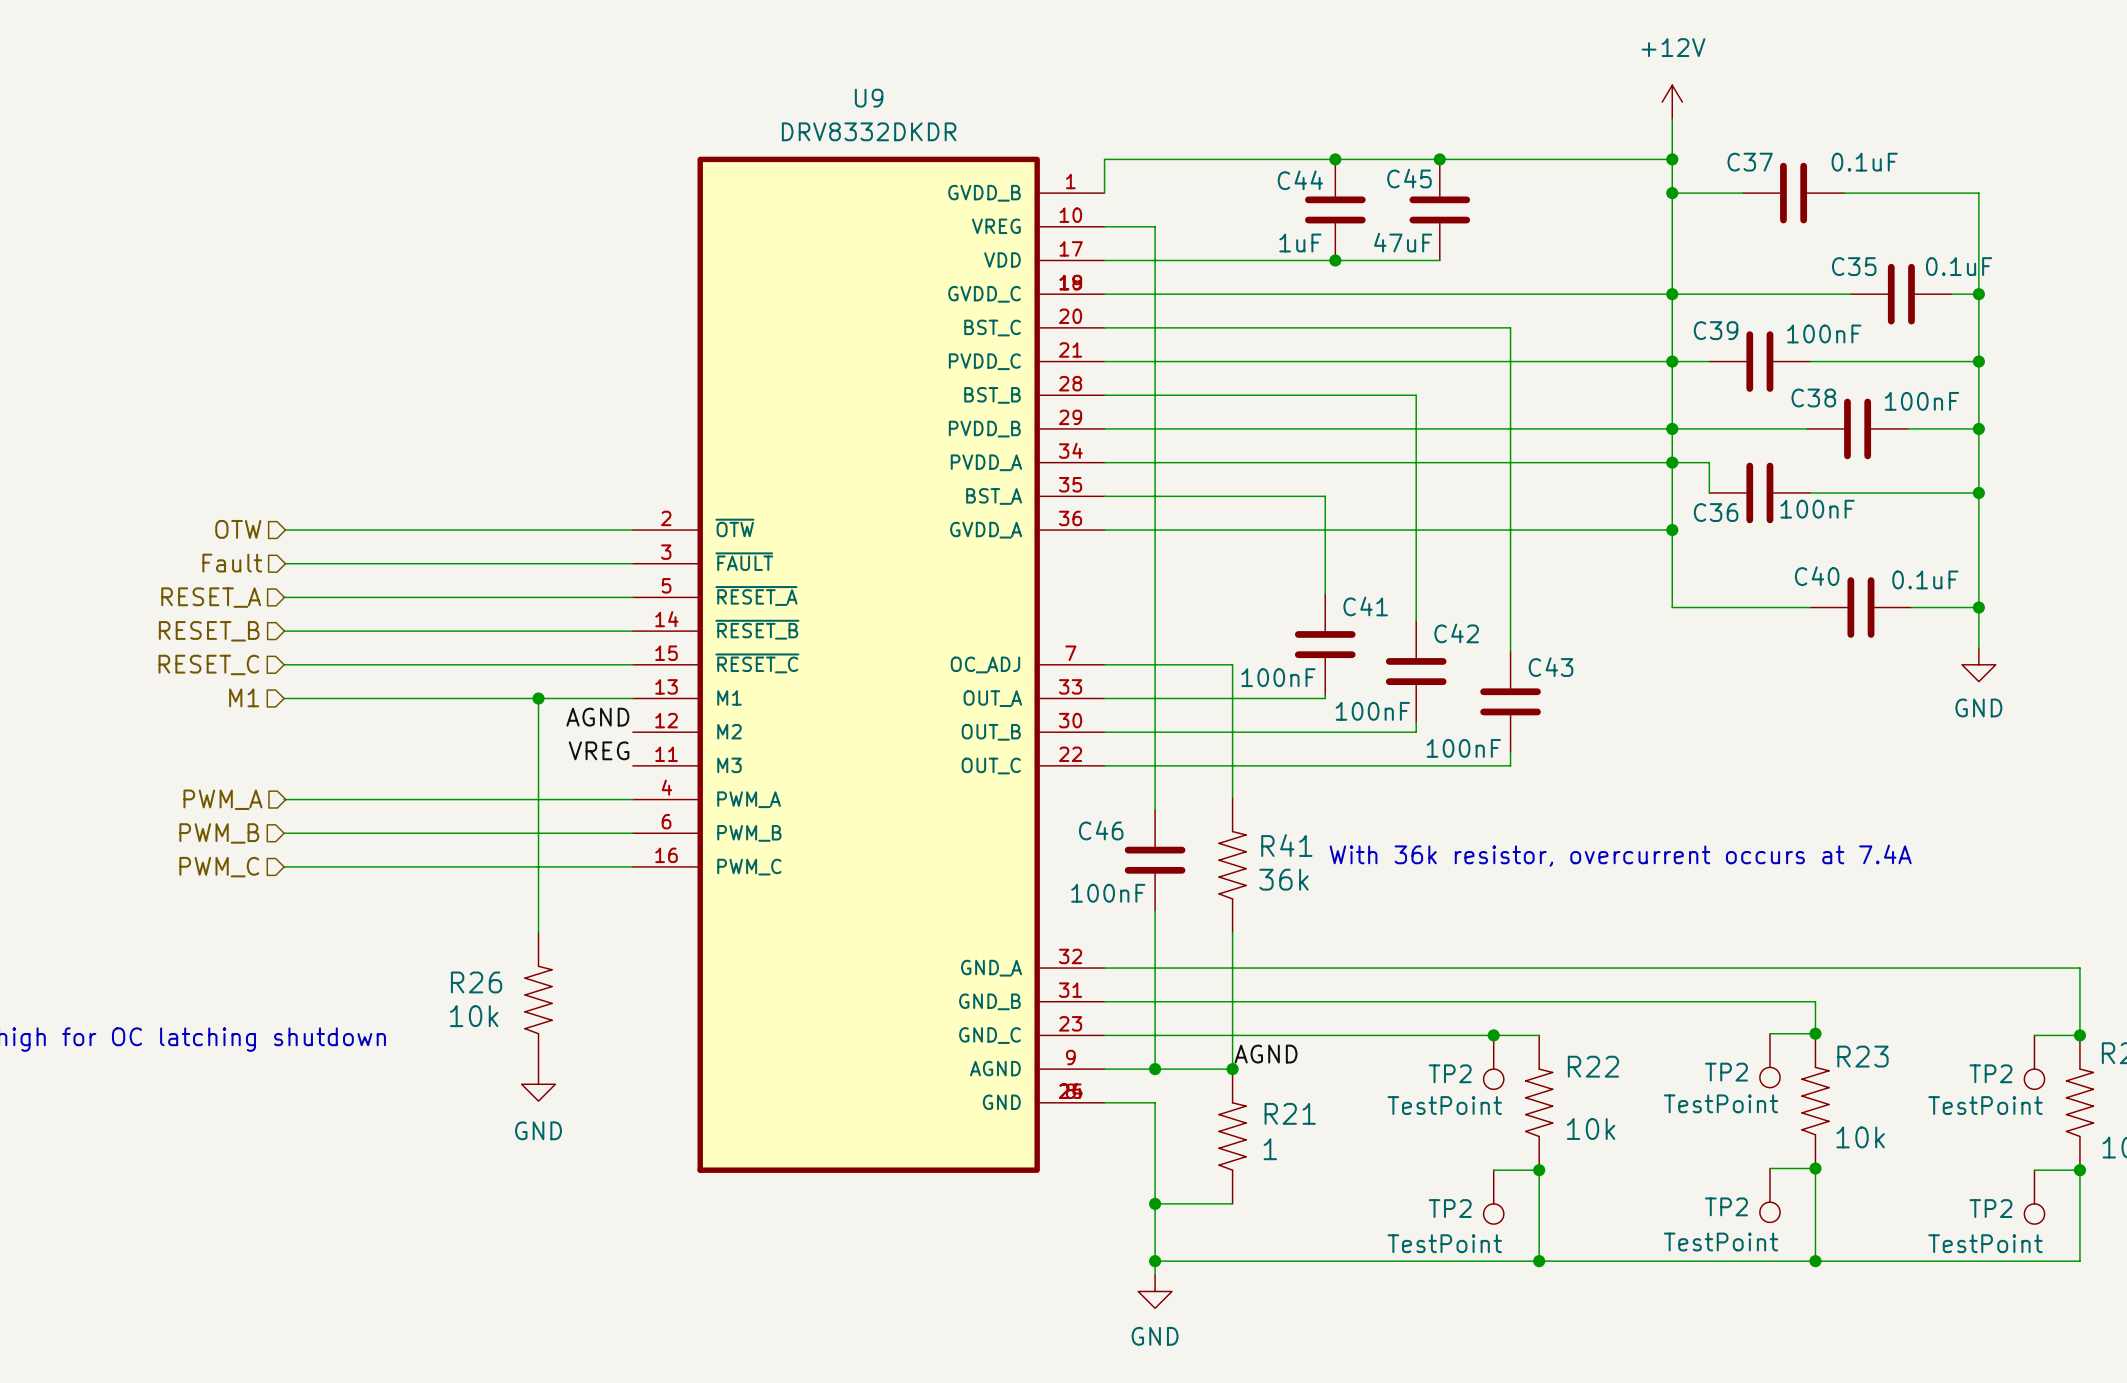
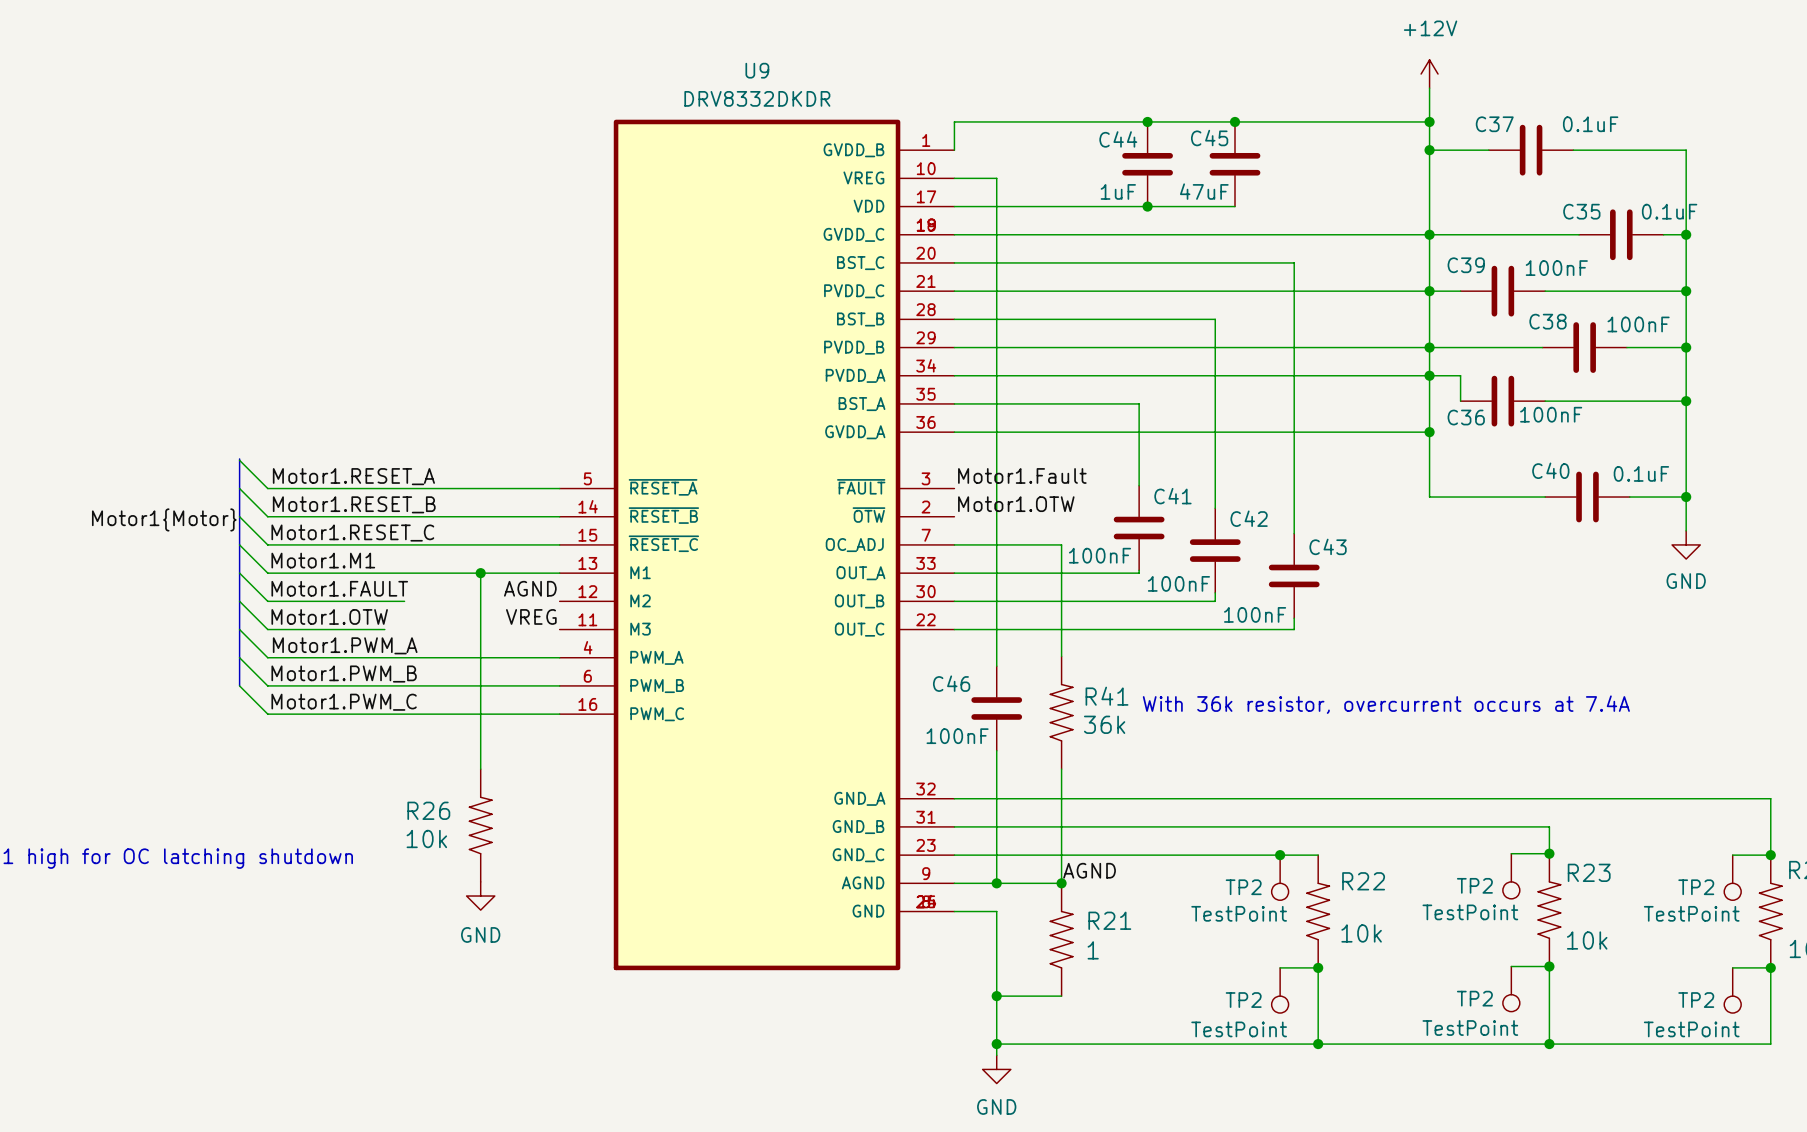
U9 symbol: [632, 156, 1105, 1173] -> [559, 119, 955, 971]
hierarchical label: OTW (238, 529) -> none
wire: (285, 530) (632, 530) -> none
bus: none -> (239, 458) (239, 685)
hierarchical label: Fault (232, 563) -> none
wire: none -> (239, 460) (268, 488)
wire: (285, 563) (632, 563) -> none
label: none -> Motor1.Fault (1022, 475)
label: none -> Motor1.RESET_A (353, 476)
hierarchical label: RESET_A (211, 597) -> none
wire: none -> (239, 488) (268, 516)
label: none -> Motor1.RESET_B (354, 504)
label: none -> Motor1.OTW (1016, 504)
hierarchical label: RESET_B (209, 631) -> none
wire: none -> (239, 516) (267, 544)
label: none -> Motor1{Motor} (164, 519)
label: none -> Motor1.RESET_C (352, 533)
hierarchical label: RESET_C (208, 664) -> none
wire: none -> (239, 544) (267, 573)
label: none -> Motor1.M1 (323, 560)
hierarchical label: M1 (244, 697) -> none
wire: none -> (239, 573) (267, 601) (404, 601)
label: none -> Motor1.FAULT (339, 588)
wire: none -> (239, 601) (267, 629) (384, 629)
label: none -> Motor1.OTW (329, 616)
wire: none -> (239, 629) (267, 657)
label: none -> Motor1.PWM_A (345, 645)
hierarchical label: PWM_A (222, 799) -> none
wire: none -> (239, 657) (267, 685)
label: none -> Motor1.PWM_B (344, 674)
hierarchical label: PWM_B (219, 833) -> none
wire: none -> (239, 685) (267, 714)
label: none -> Motor1.PWM_C (344, 702)
hierarchical label: PWM_C (219, 867) -> none

